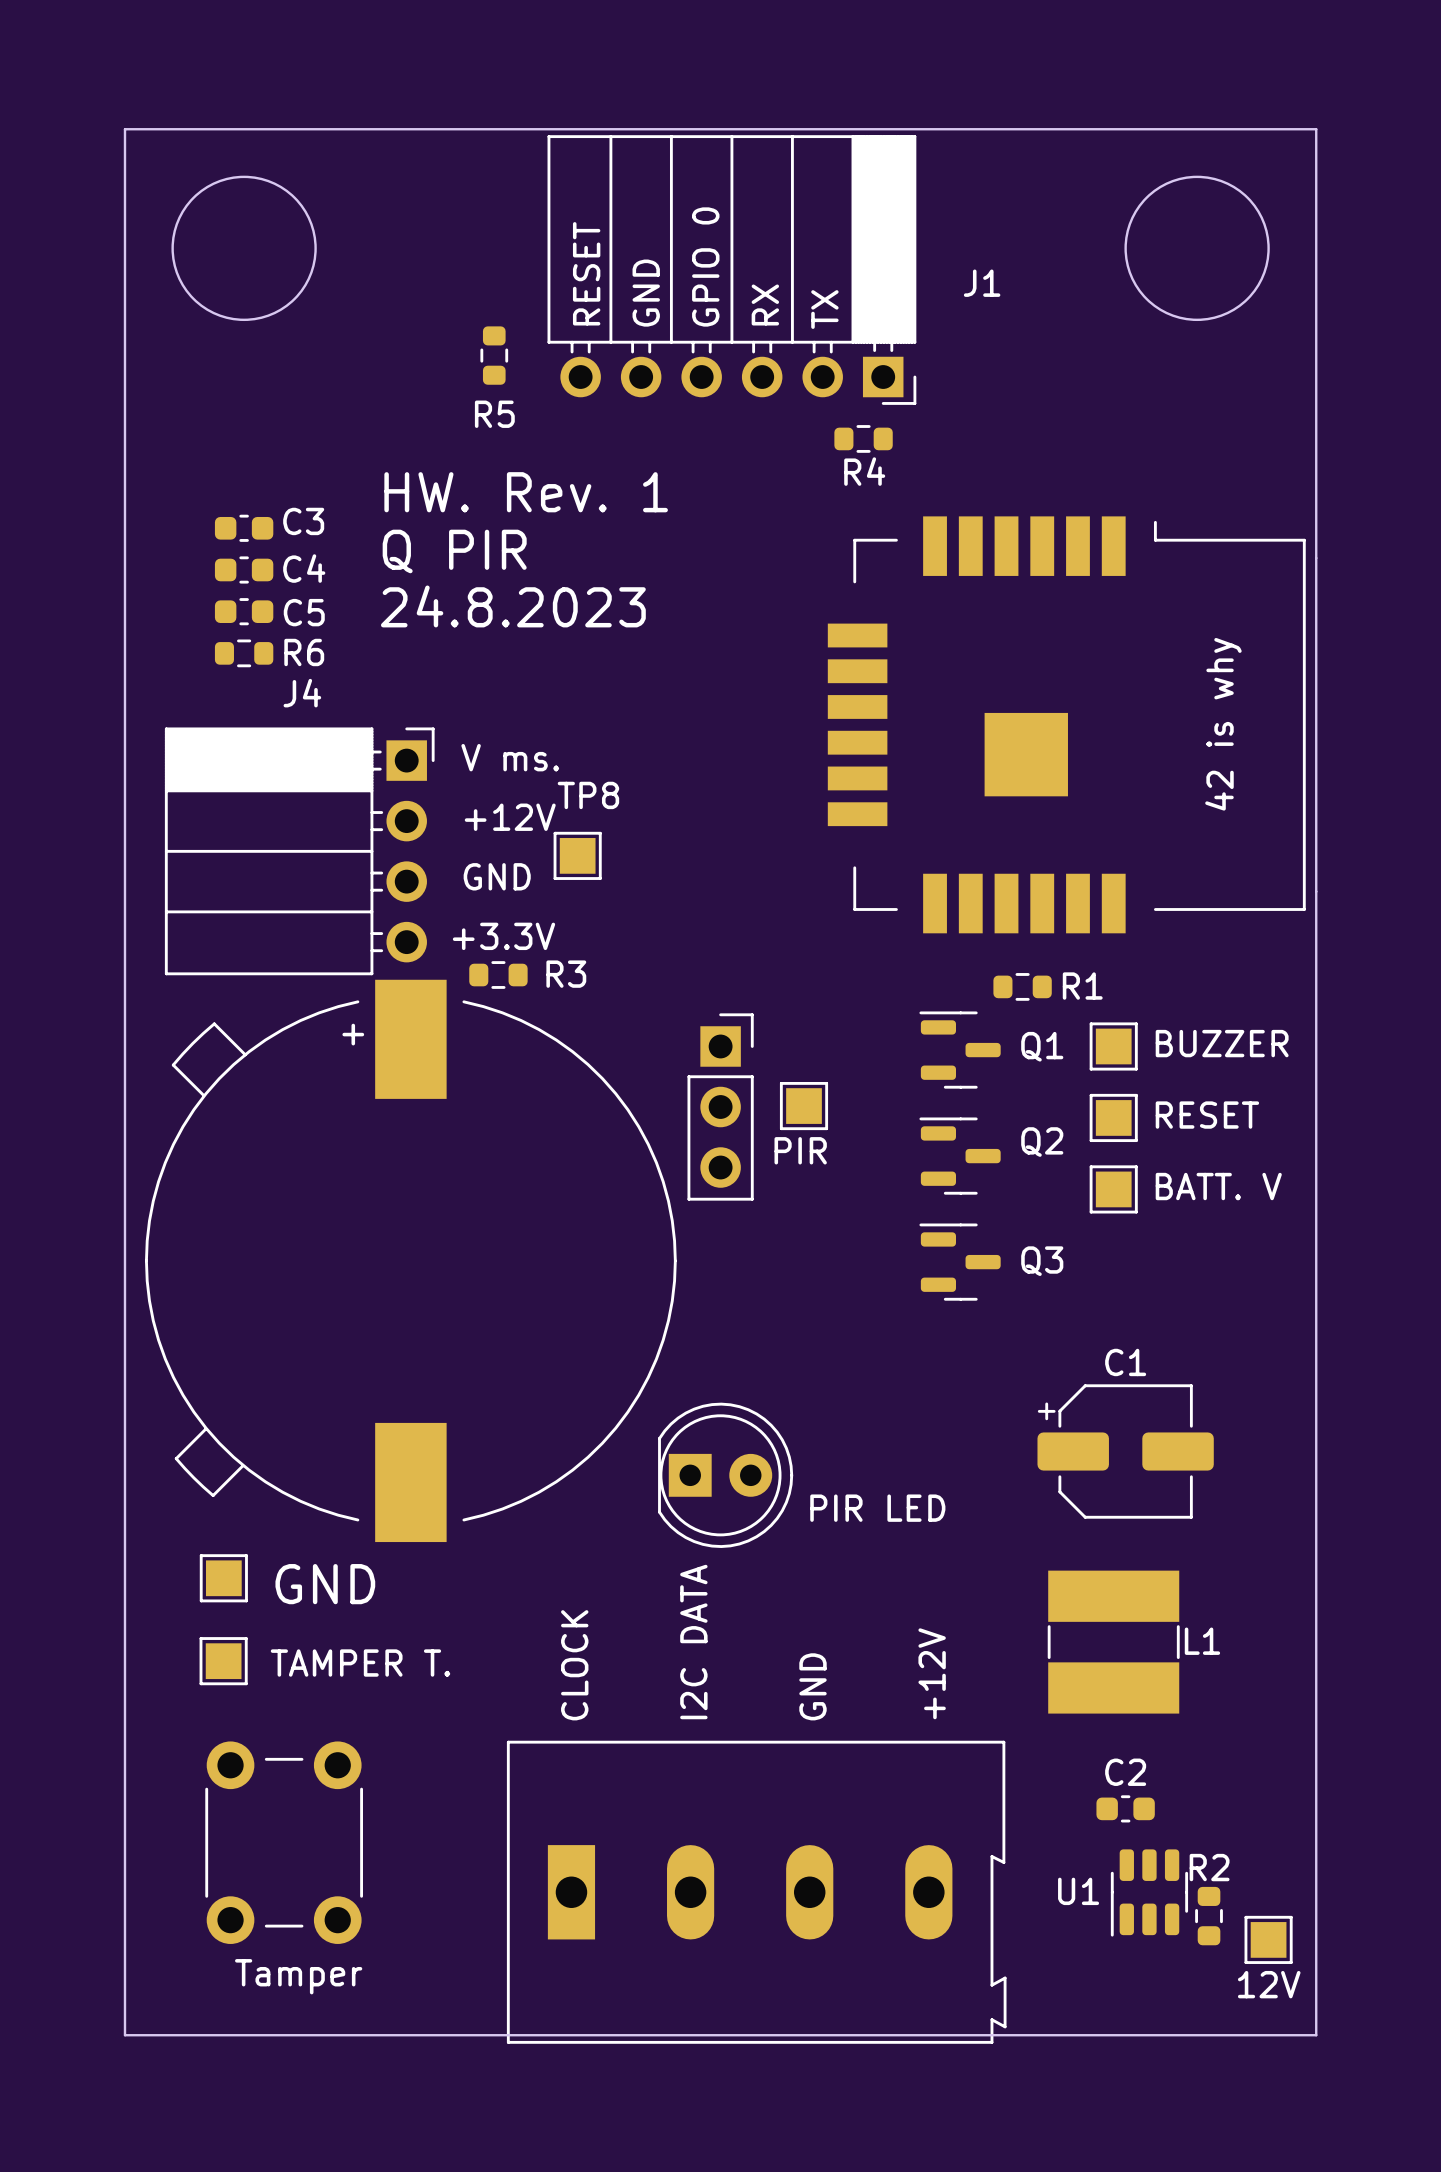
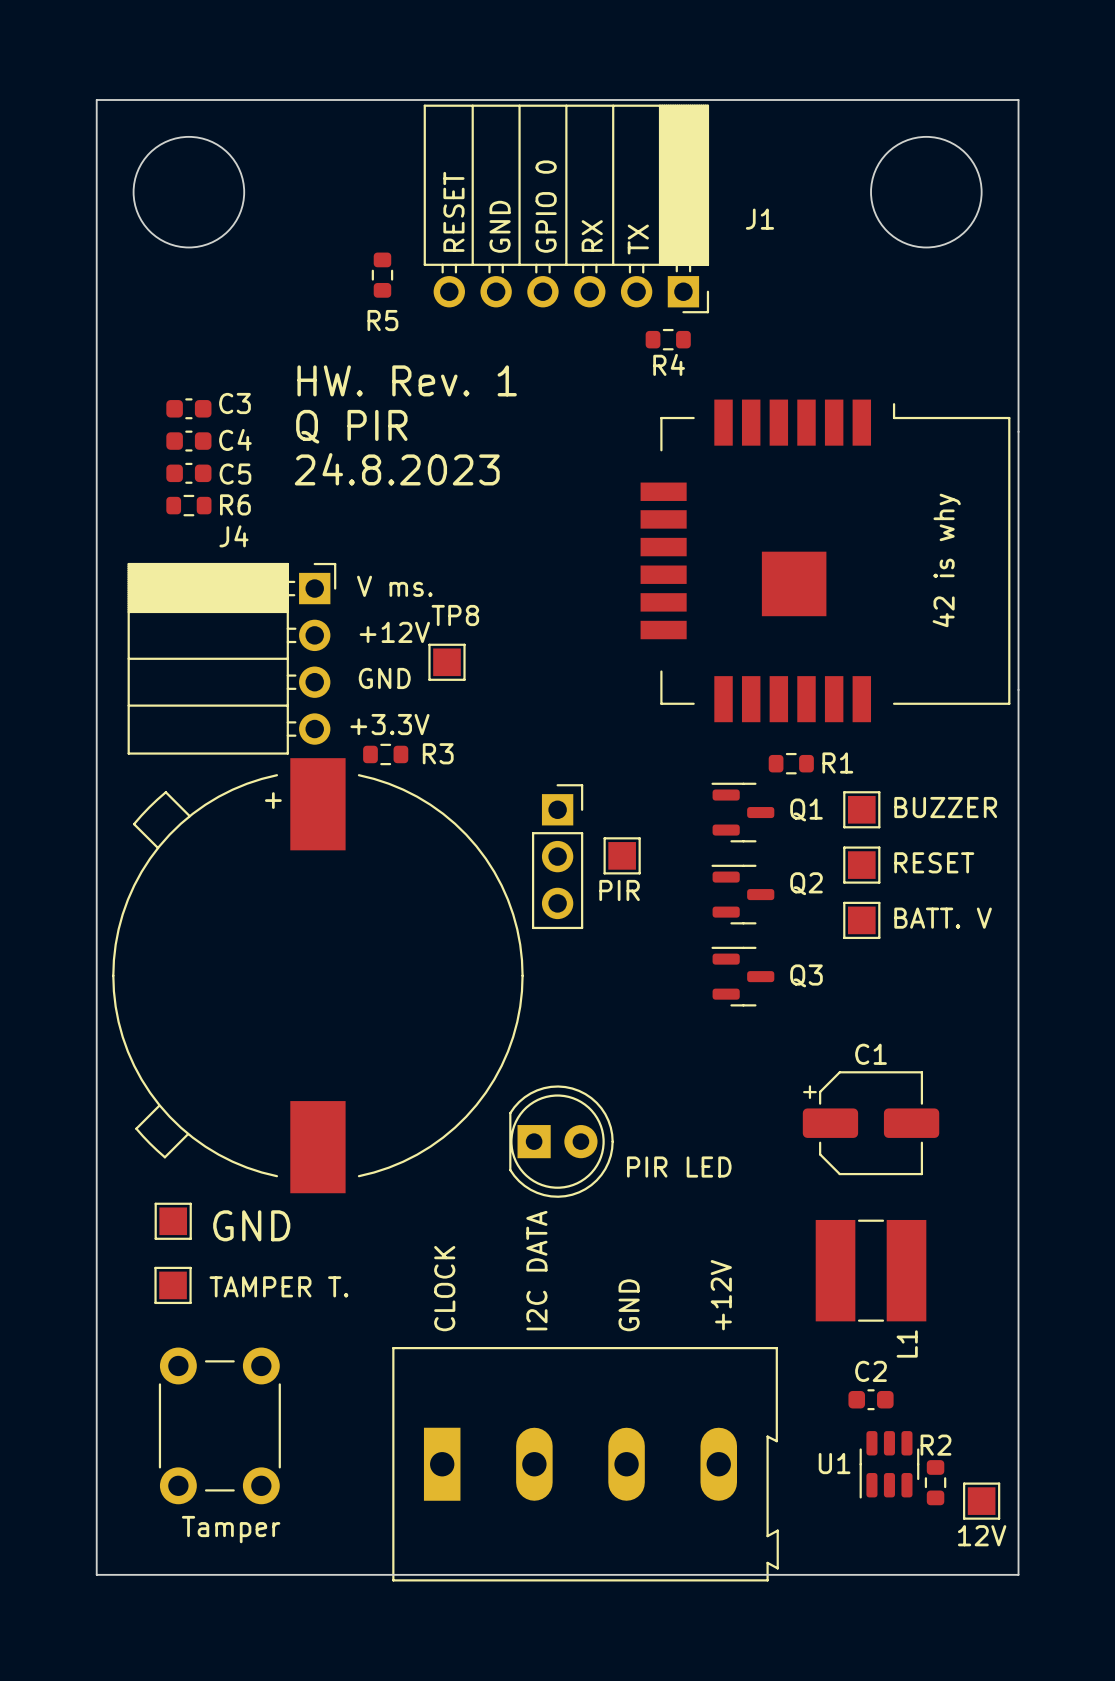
L1 name position: L1 (1202, 1641) -> L1 (907, 1343)
L1 rotation: 0° (1113, 1642) -> 90° clockwise (871, 1270)

